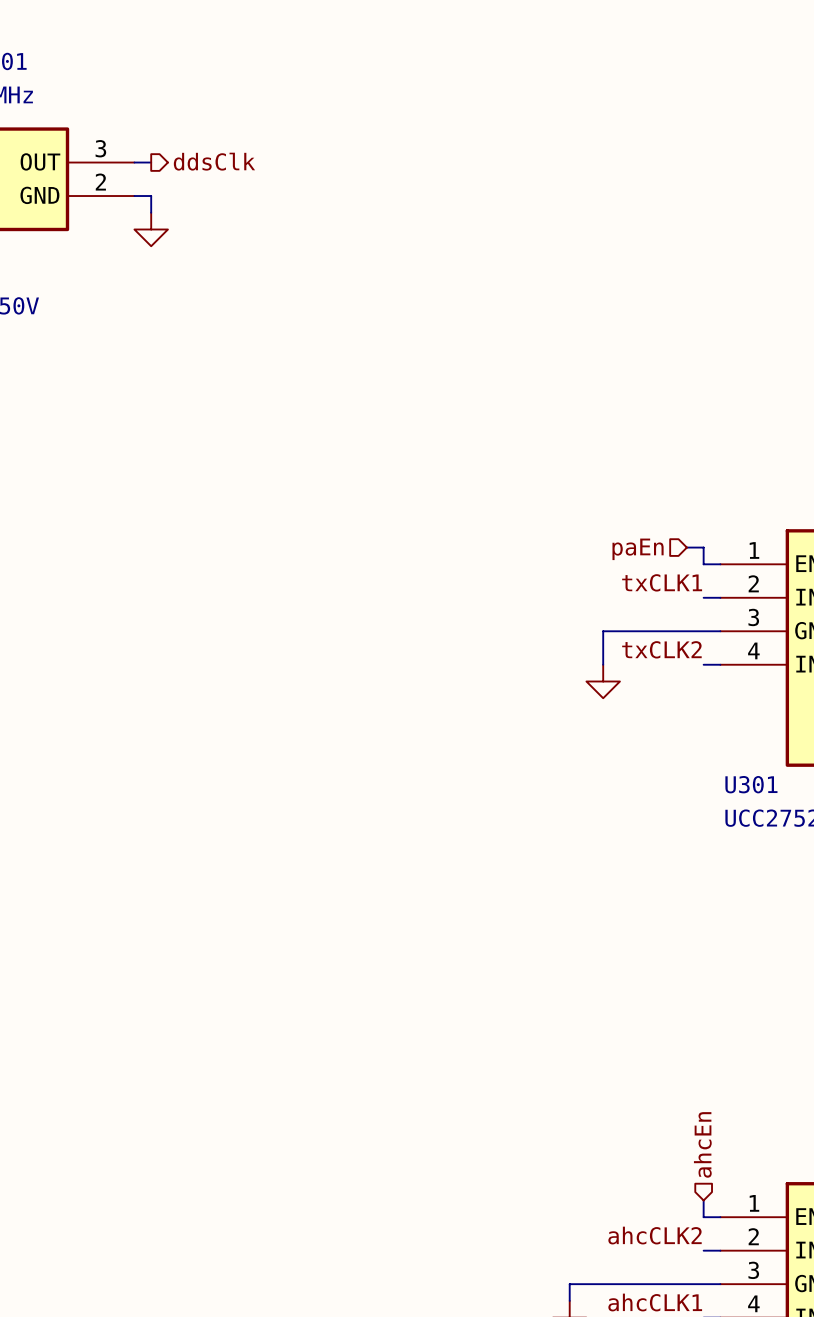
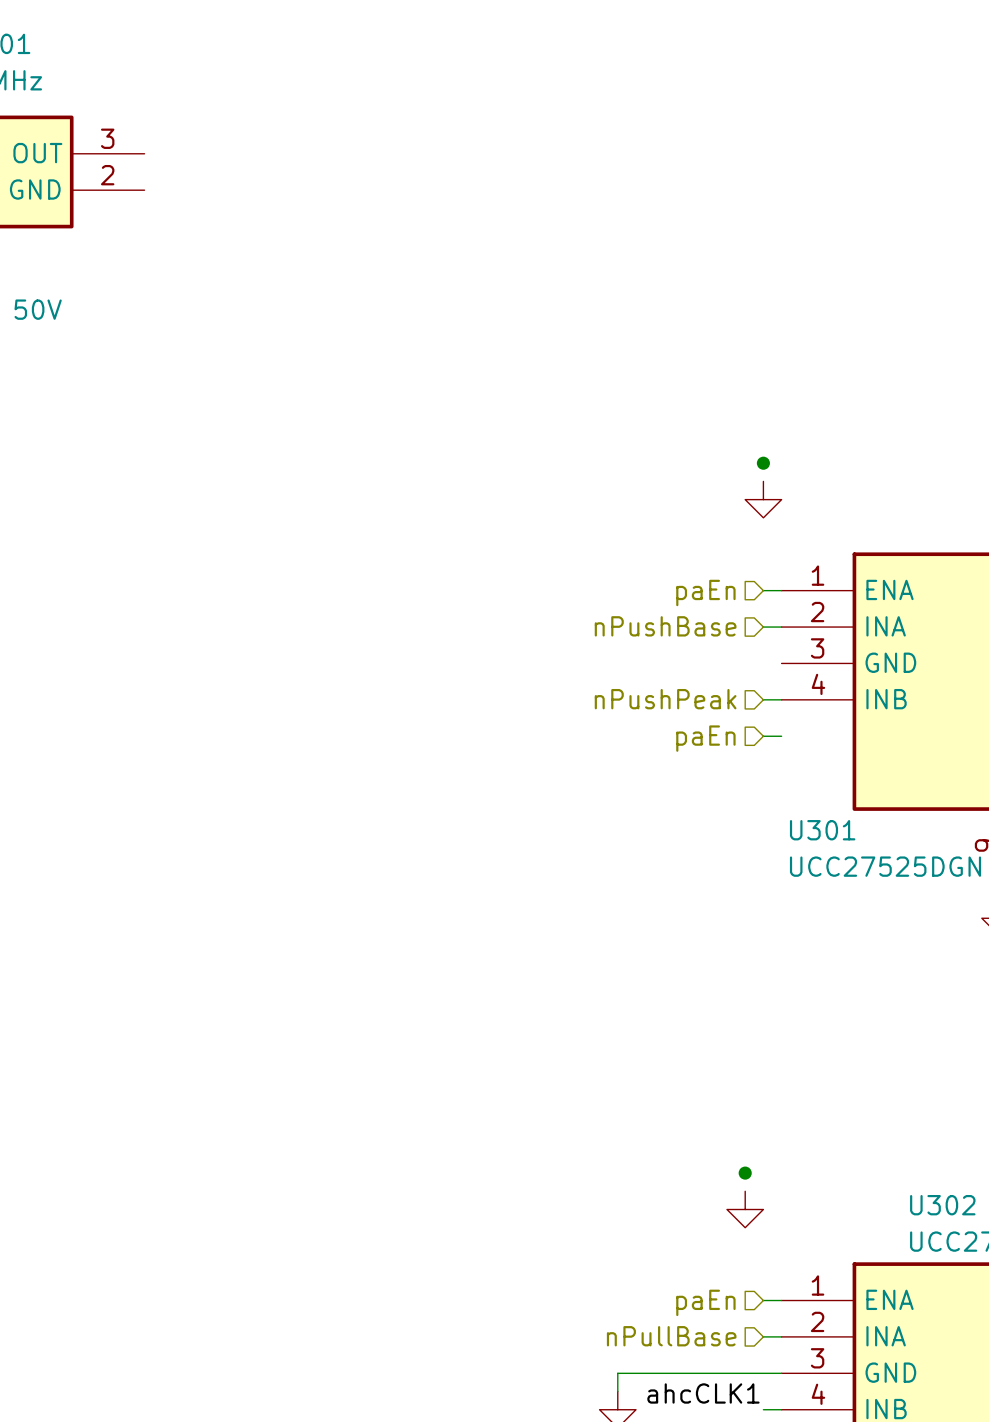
hierarchical label: ddsClk (214, 161) -> none
wire: (134, 162) (151, 162) -> none
wire: (134, 196) (151, 196) (151, 212) -> none
power symbol: (151, 229) -> none
junction: none -> (763, 463)
power symbol: none -> (763, 499)
wire: (686, 547) (703, 547) (703, 564) -> none
hierarchical label position: paEn (638, 549) -> paEn (705, 592)
label: txCLK1 (662, 582) -> none
hierarchical label: none -> nPushBase (665, 626)
wire: (720, 631) (603, 631) (603, 664) -> none
label: txCLK2 (661, 649) -> none
hierarchical label: none -> nPushPeak (665, 699)
power symbol: (603, 681) -> none
wire: none -> (763, 736) (781, 736)
hierarchical label: none -> paEn (705, 738)
junction: none -> (745, 1173)
power symbol: none -> (745, 1209)
hierarchical label: ahcEn (702, 1144) -> none
wire: (703, 1200) (703, 1217) -> none
hierarchical label: none -> paEn (705, 1302)
label: ahcCLK2 (655, 1235) -> none
hierarchical label: none -> nPullBase (671, 1336)

